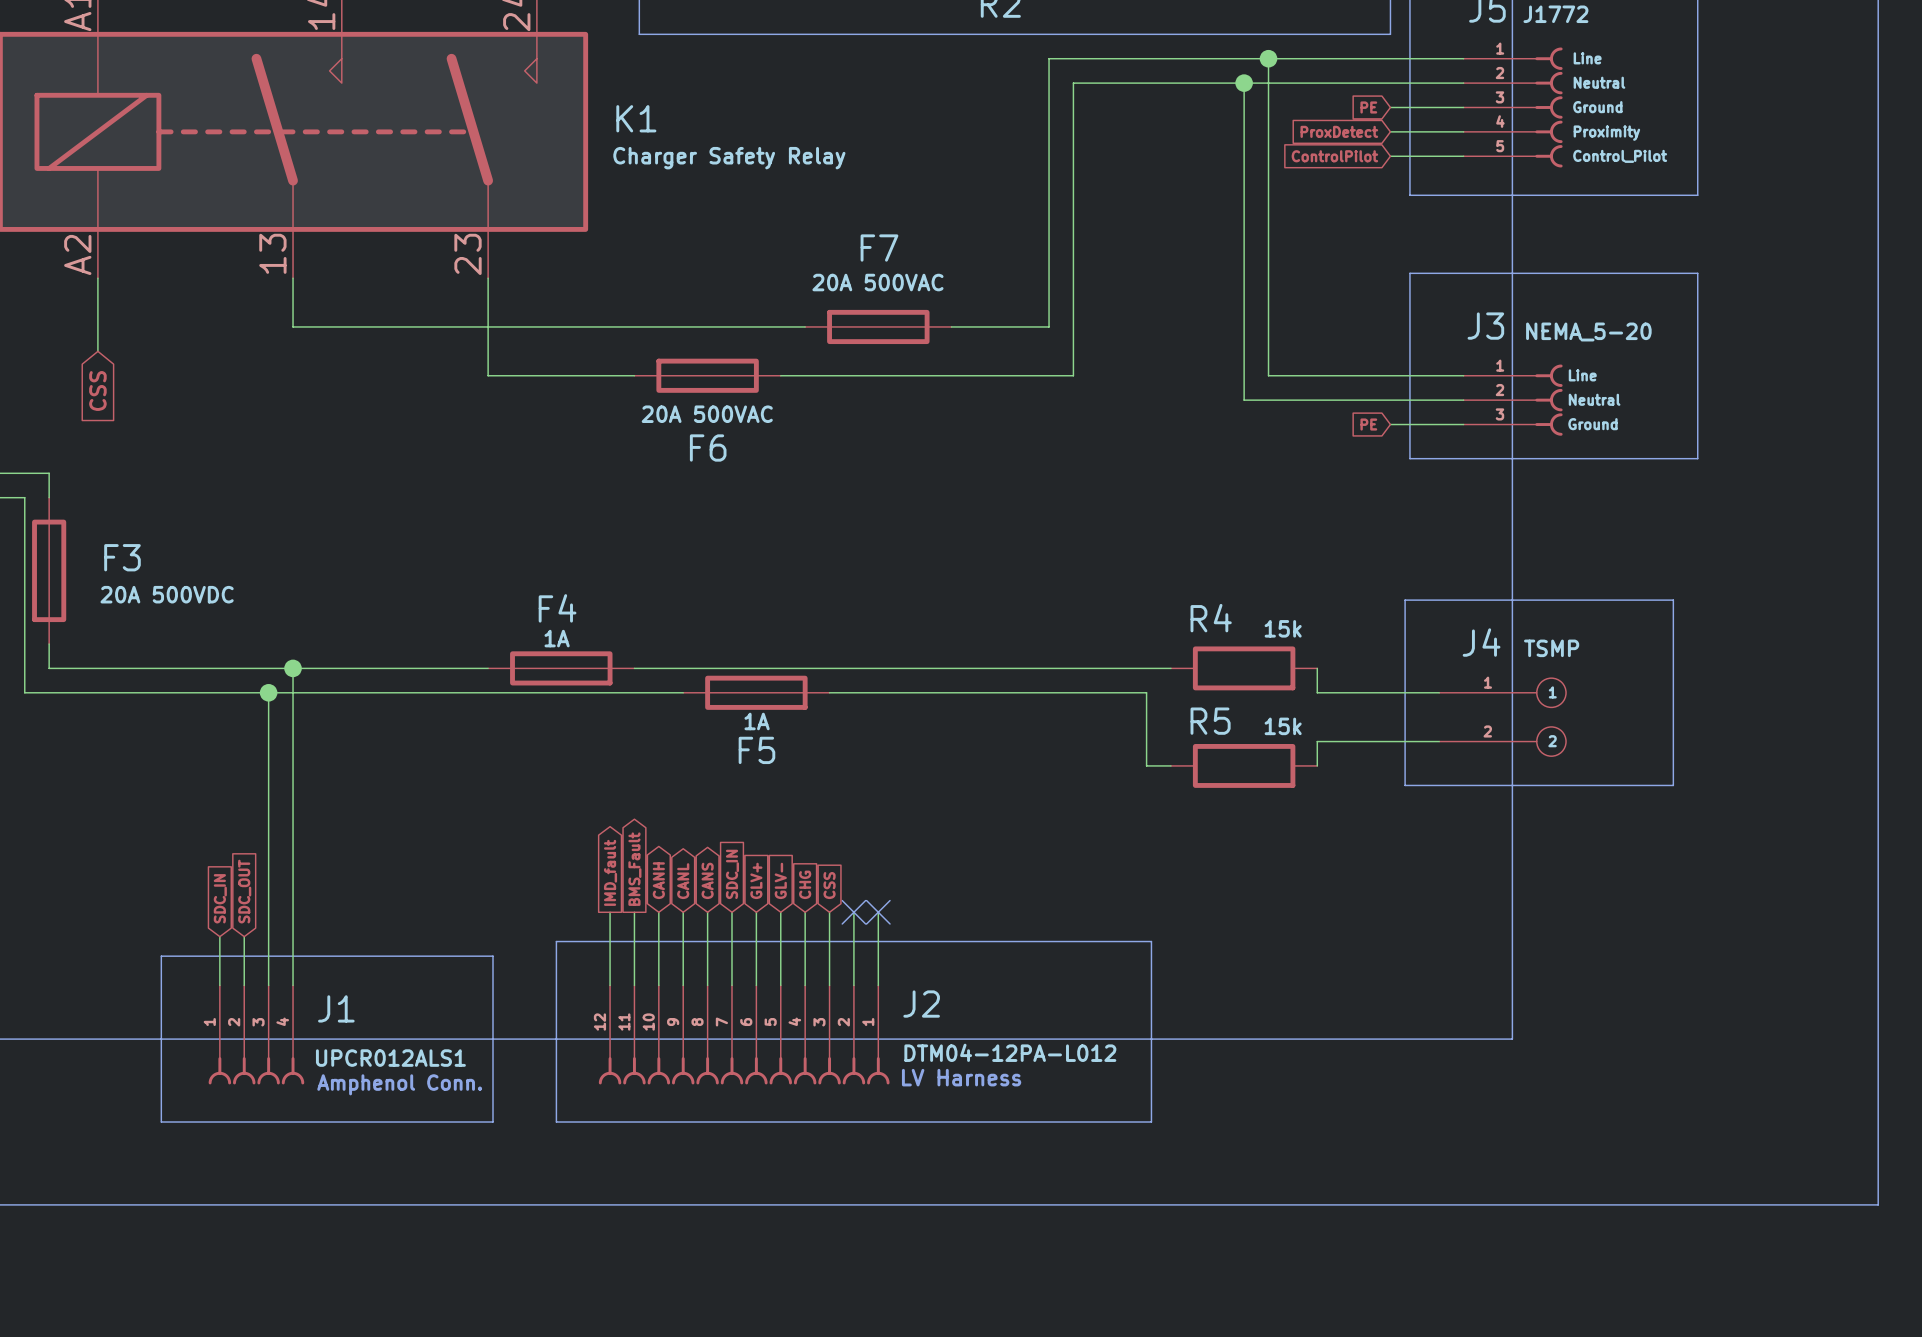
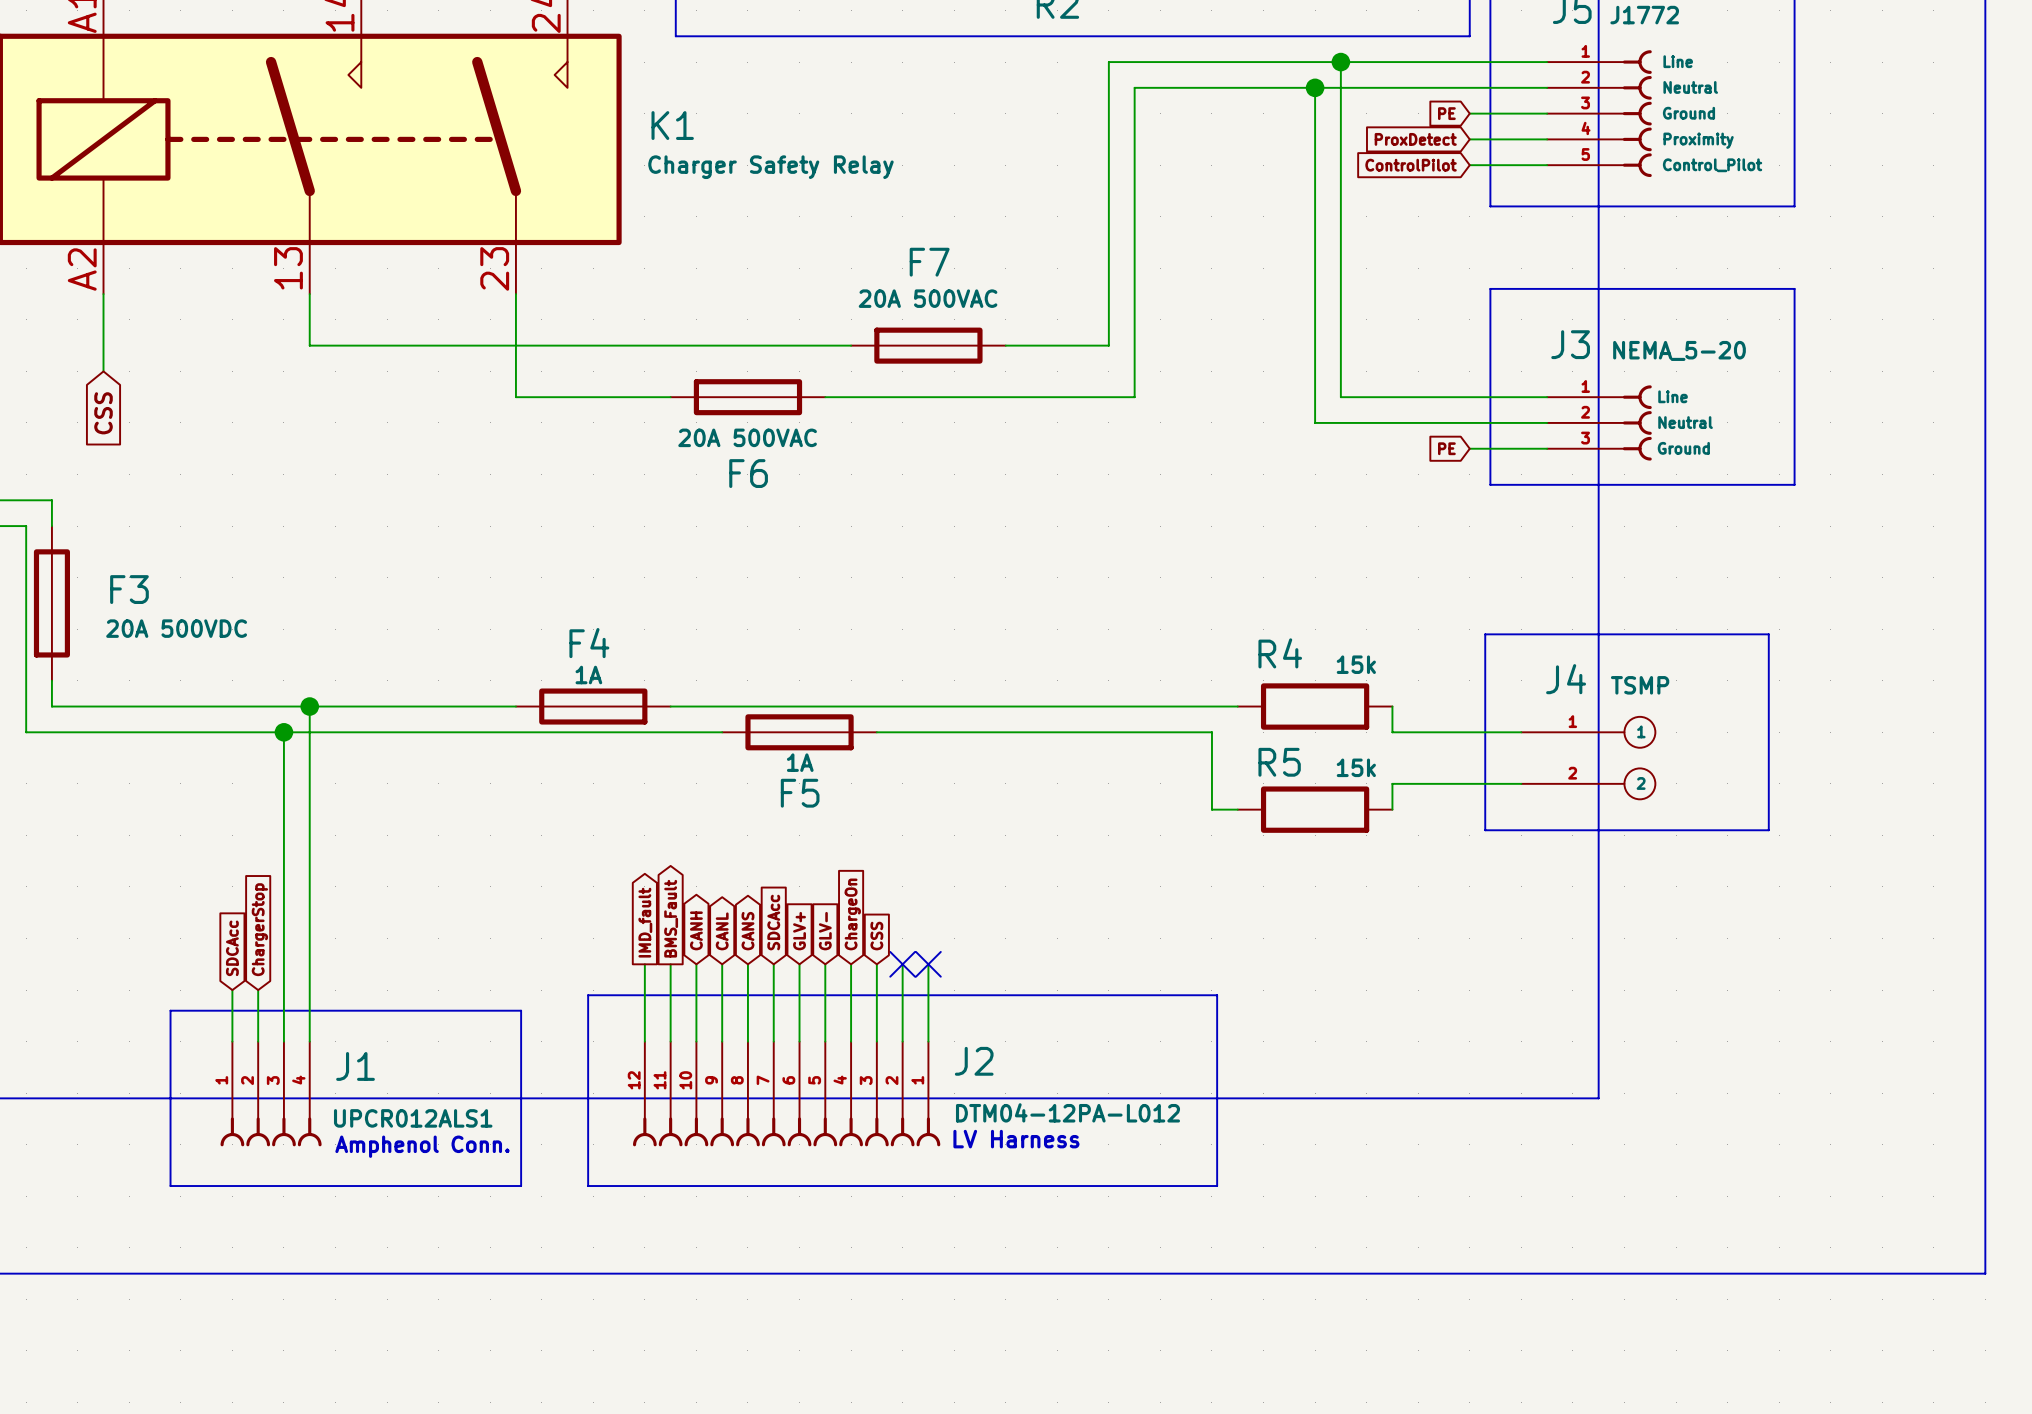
global label: SDC_IN (732, 874) -> SDCAcc (773, 922)
global label: CHG (805, 884) -> ChargeOn (852, 914)
global label: SDC_OUT (244, 891) -> ChargerStop (259, 929)
global label: SDC_IN (220, 898) -> SDCAcc (232, 948)

